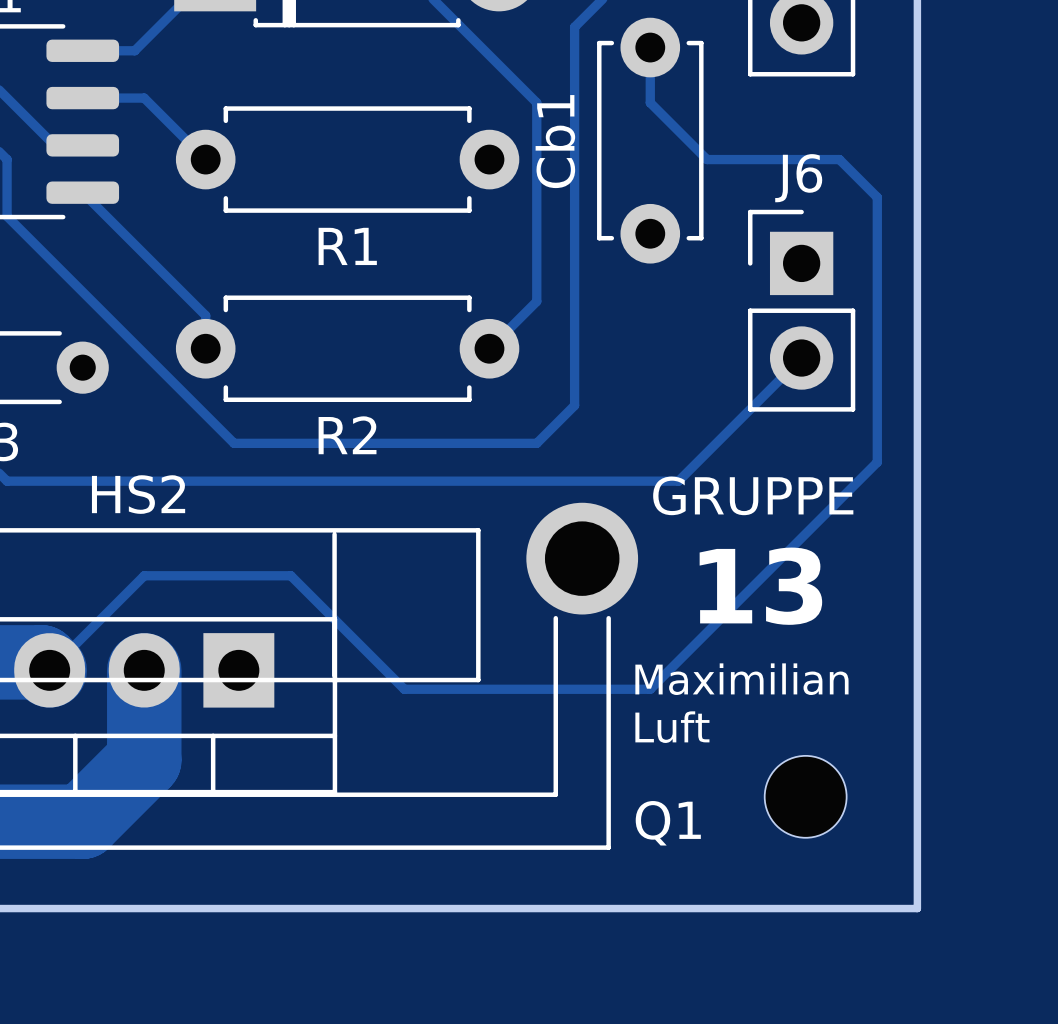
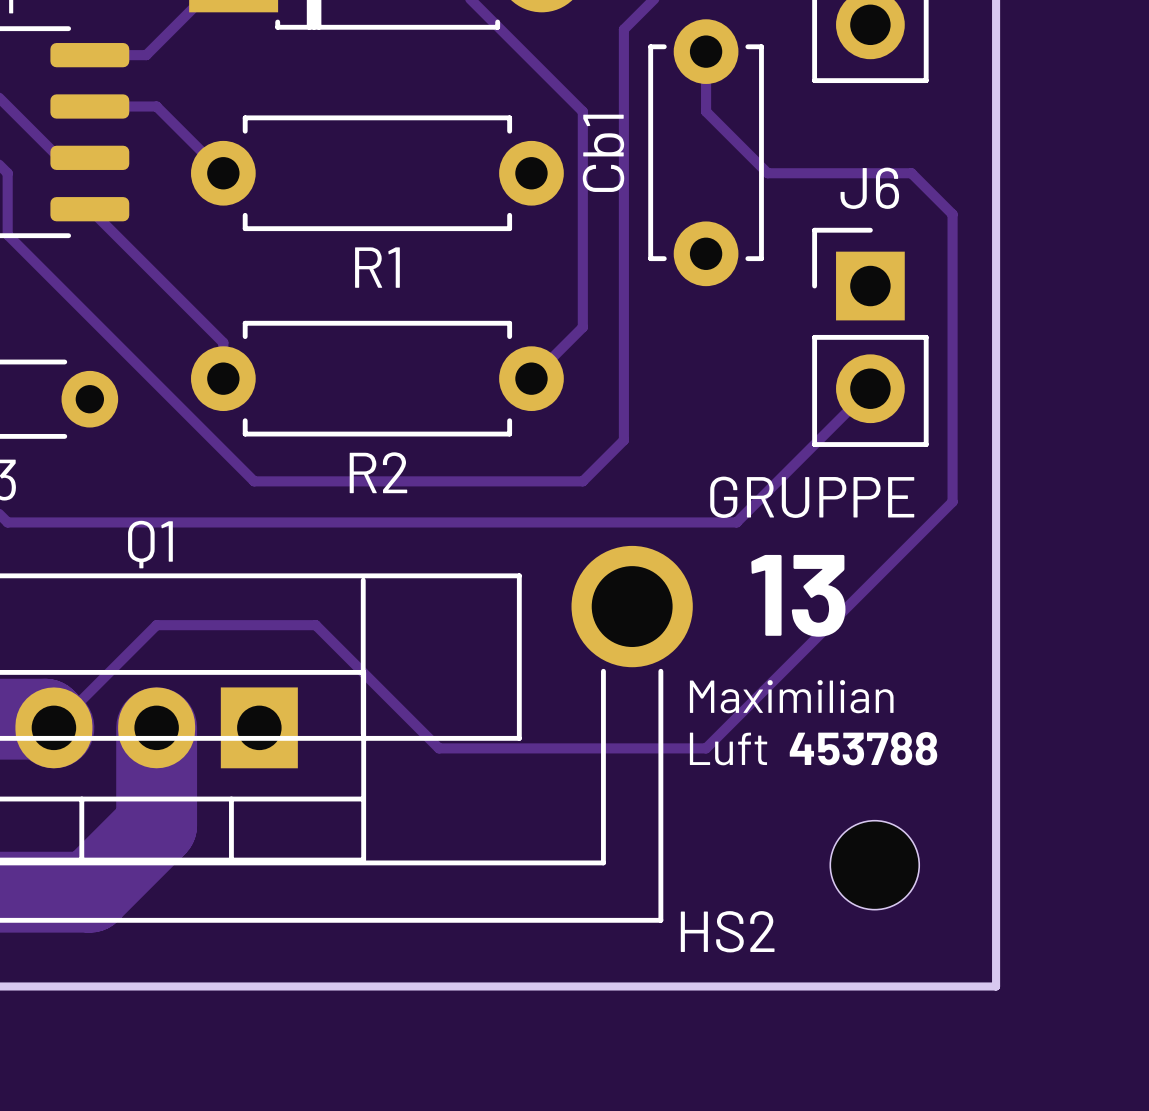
HS2 name position: HS2 (138, 494) -> HS2 (727, 931)
text position: GRUPPE (753, 495) -> GRUPPE (812, 497)
text position: 13 (760, 586) -> 13 (798, 595)
text: none -> Maximilian (791, 696)
text: Maximilian (741, 679) -> Luft (728, 748)
text: none -> 453788 (863, 748)
text: Luft (672, 727) -> none
Q1 name position: Q1 (668, 823) -> Q1 (150, 544)

